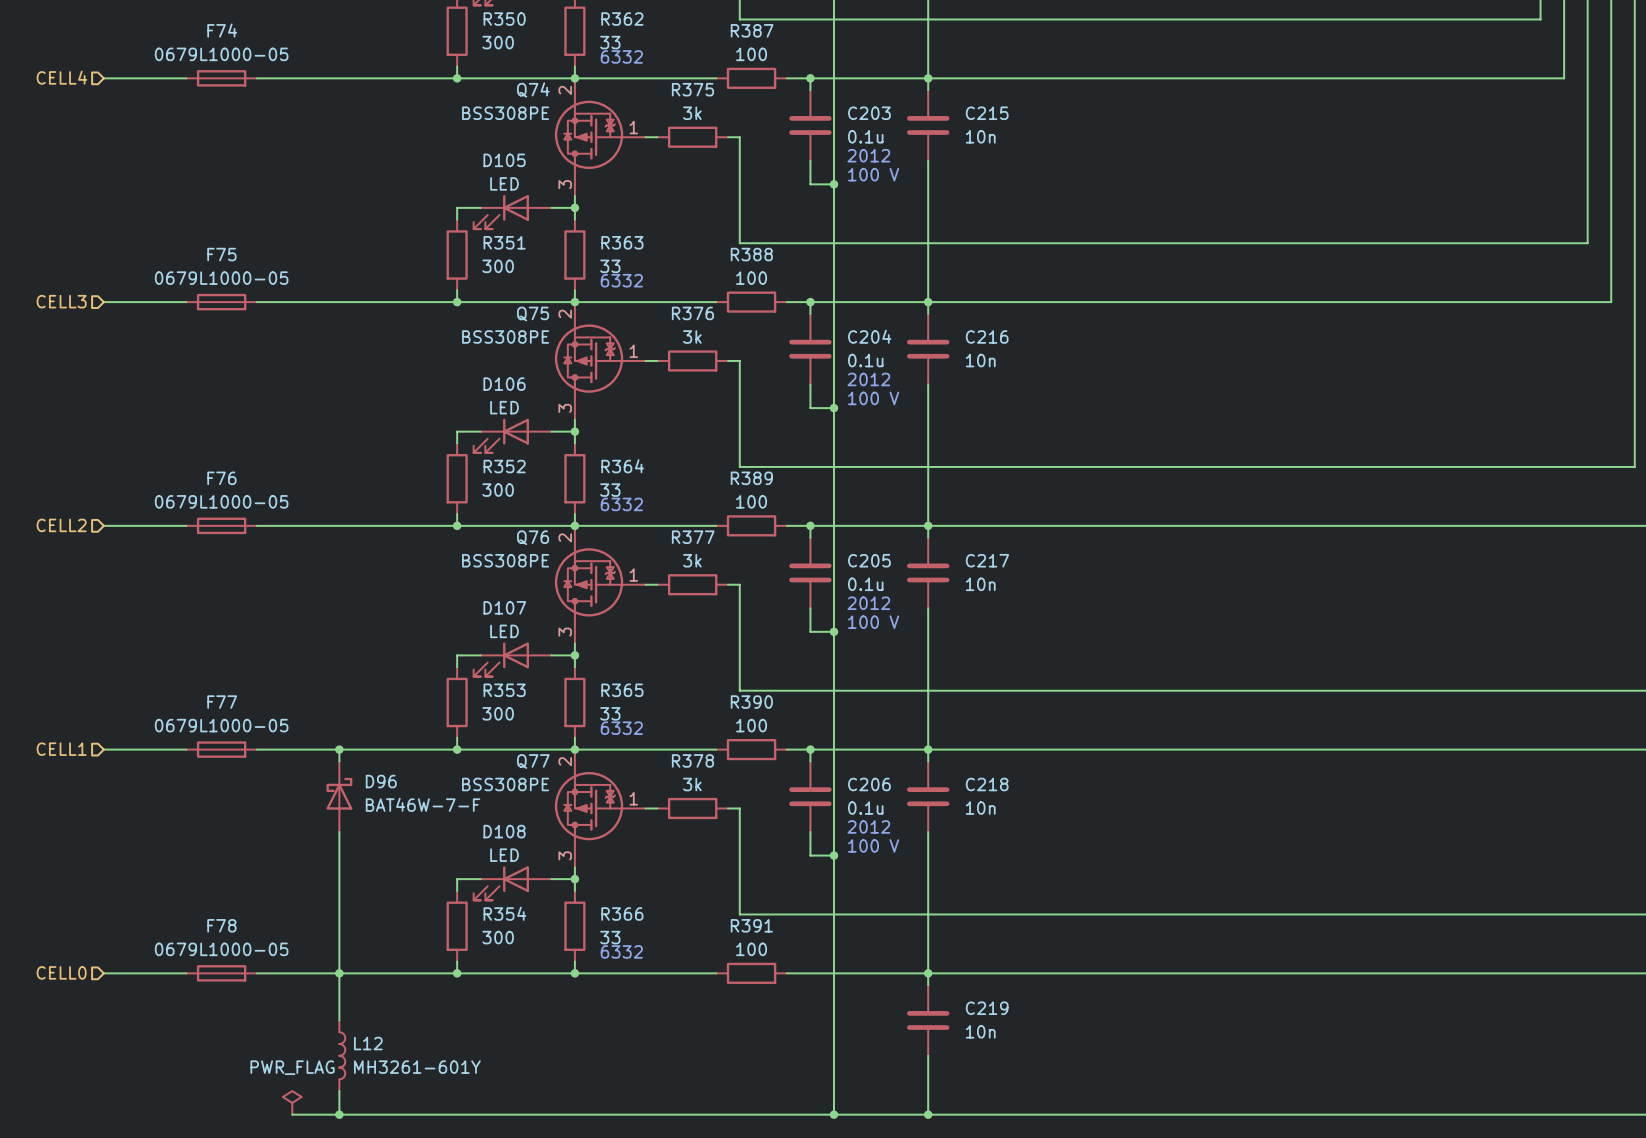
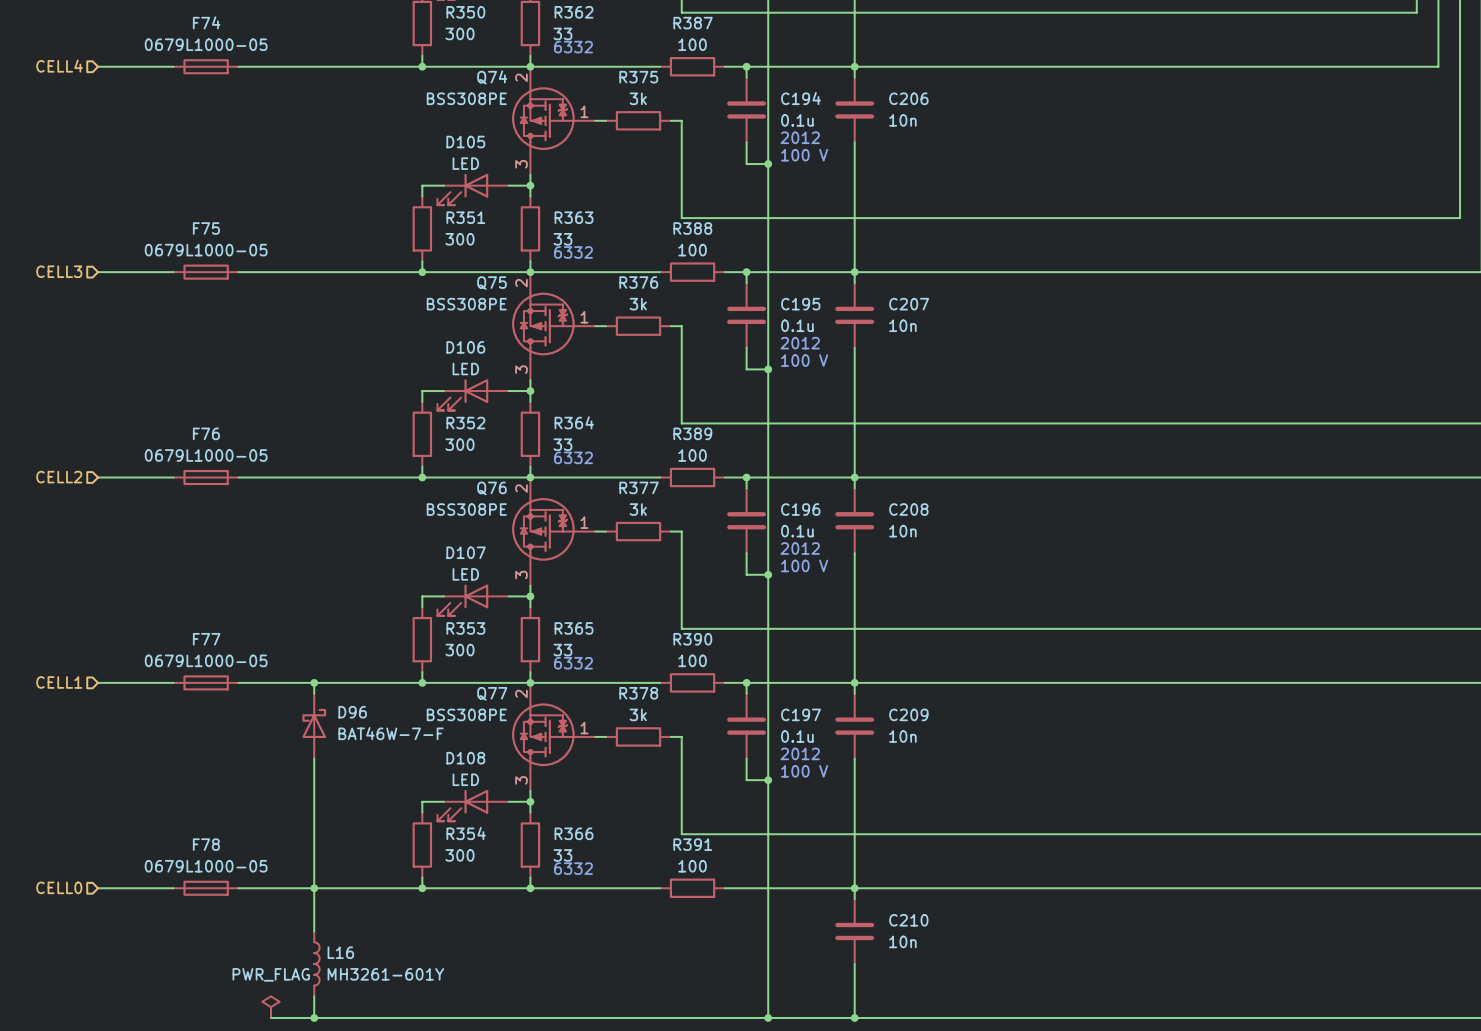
C203 name: C203 (869, 113) -> C194 (800, 98)
C215 name: C215 (987, 113) -> C206 (908, 98)
C204 name: C204 (869, 336) -> C195 (800, 304)
C216 name: C216 (987, 336) -> C207 (909, 304)
C205 name: C205 (869, 560) -> C196 (800, 509)
C217 name: C217 (987, 560) -> C208 (908, 509)
C206 name: C206 (869, 784) -> C197 (800, 714)
C218 name: C218 (987, 784) -> C209 (908, 714)
C219 name: C219 (987, 1008) -> C210 (908, 920)
L12 name: L12 (368, 1043) -> L16 (340, 952)

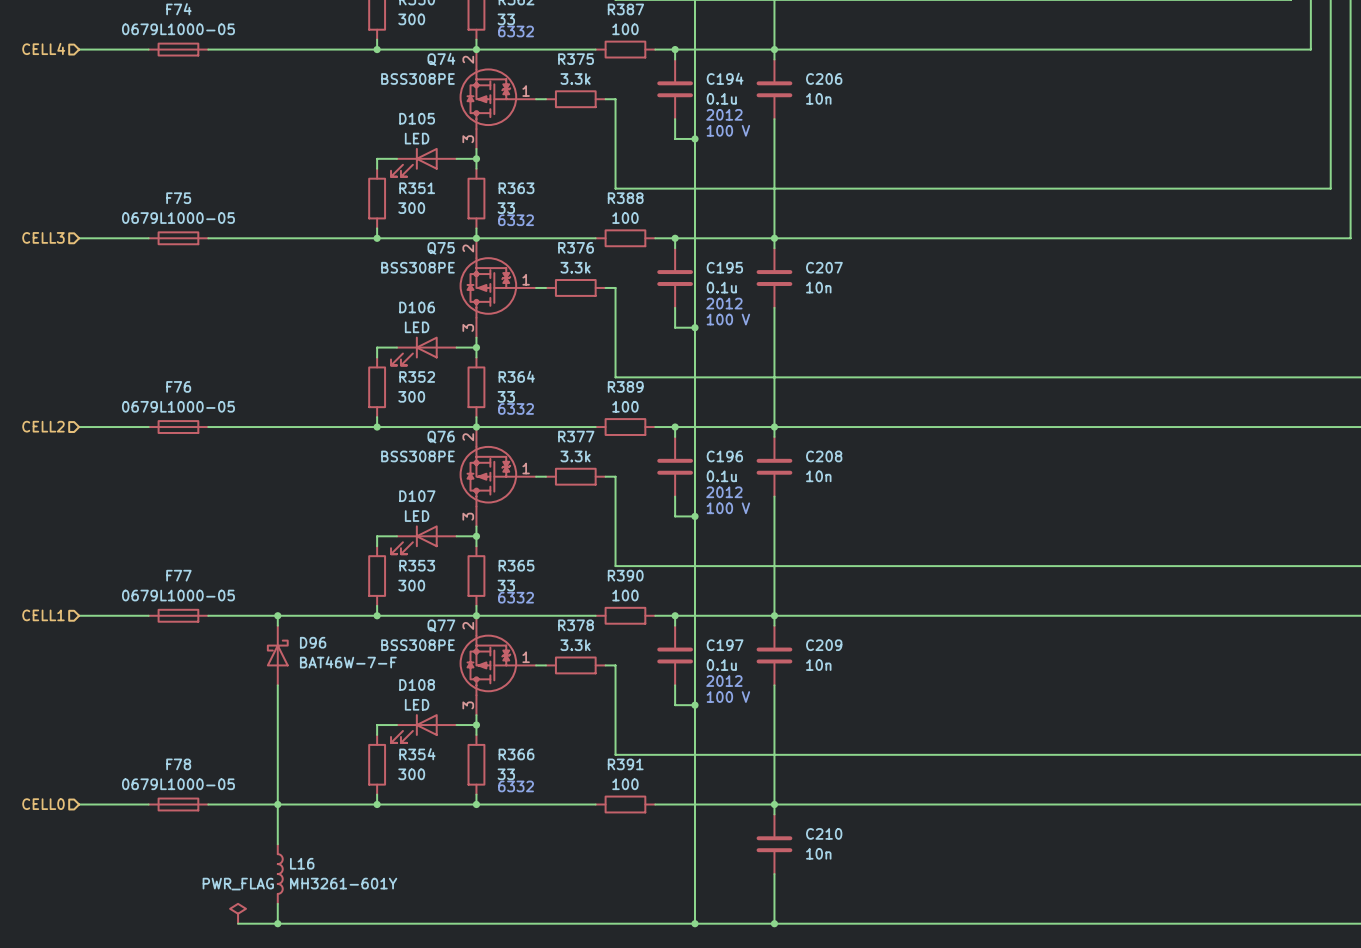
R375 value: 3k (638, 98) -> 3.3k (575, 78)
R376 value: 3k (638, 304) -> 3.3k (575, 267)
R377 value: 3k (638, 509) -> 3.3k (575, 456)
R378 value: 3k (638, 714) -> 3.3k (575, 645)

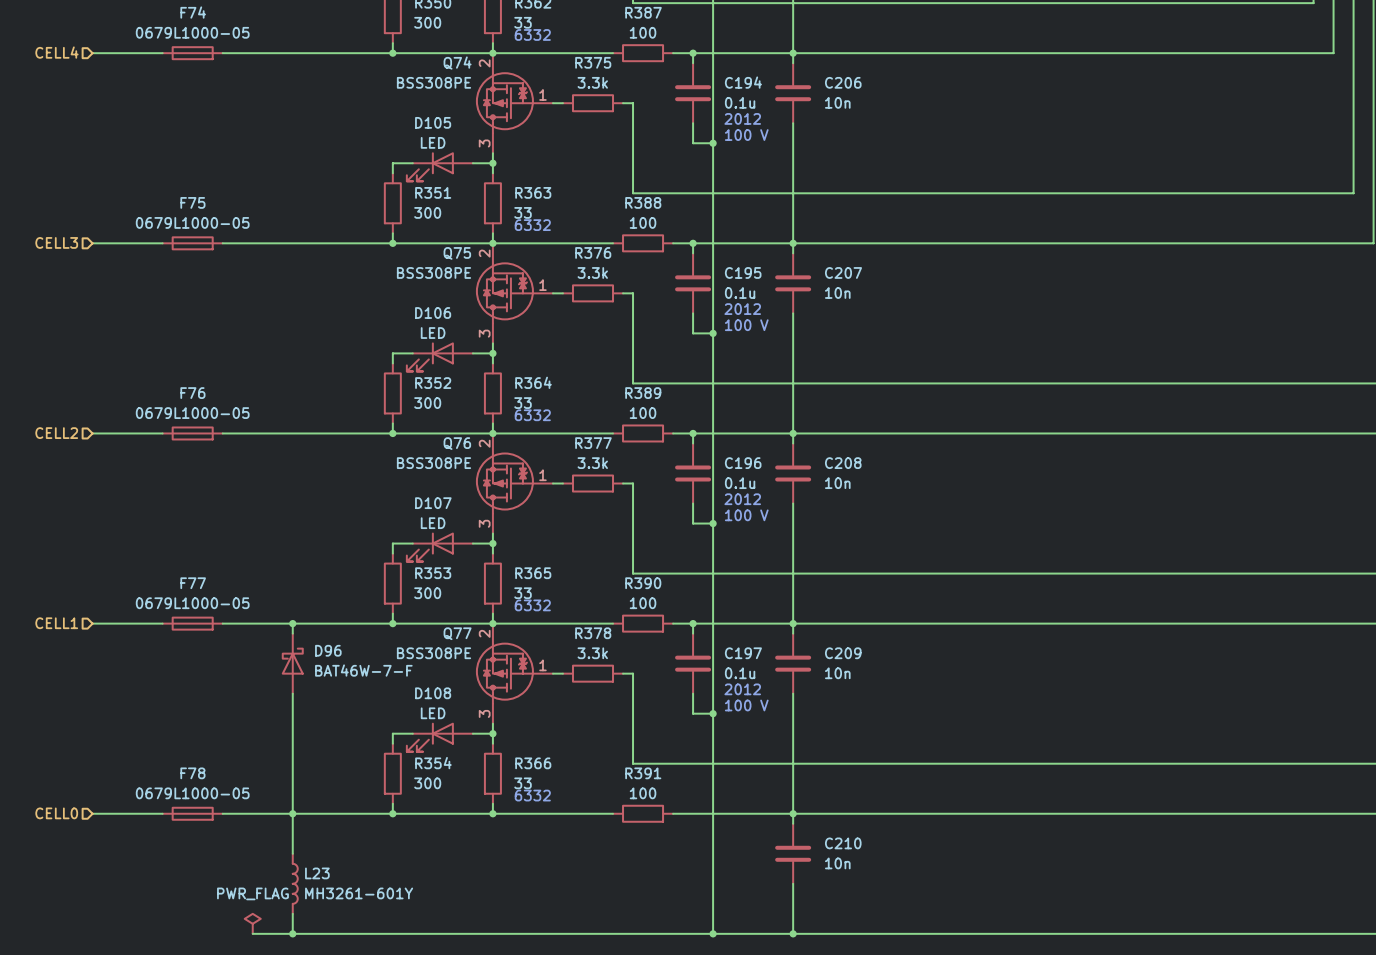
L16 name: L16 (302, 863) -> L23 (317, 873)

